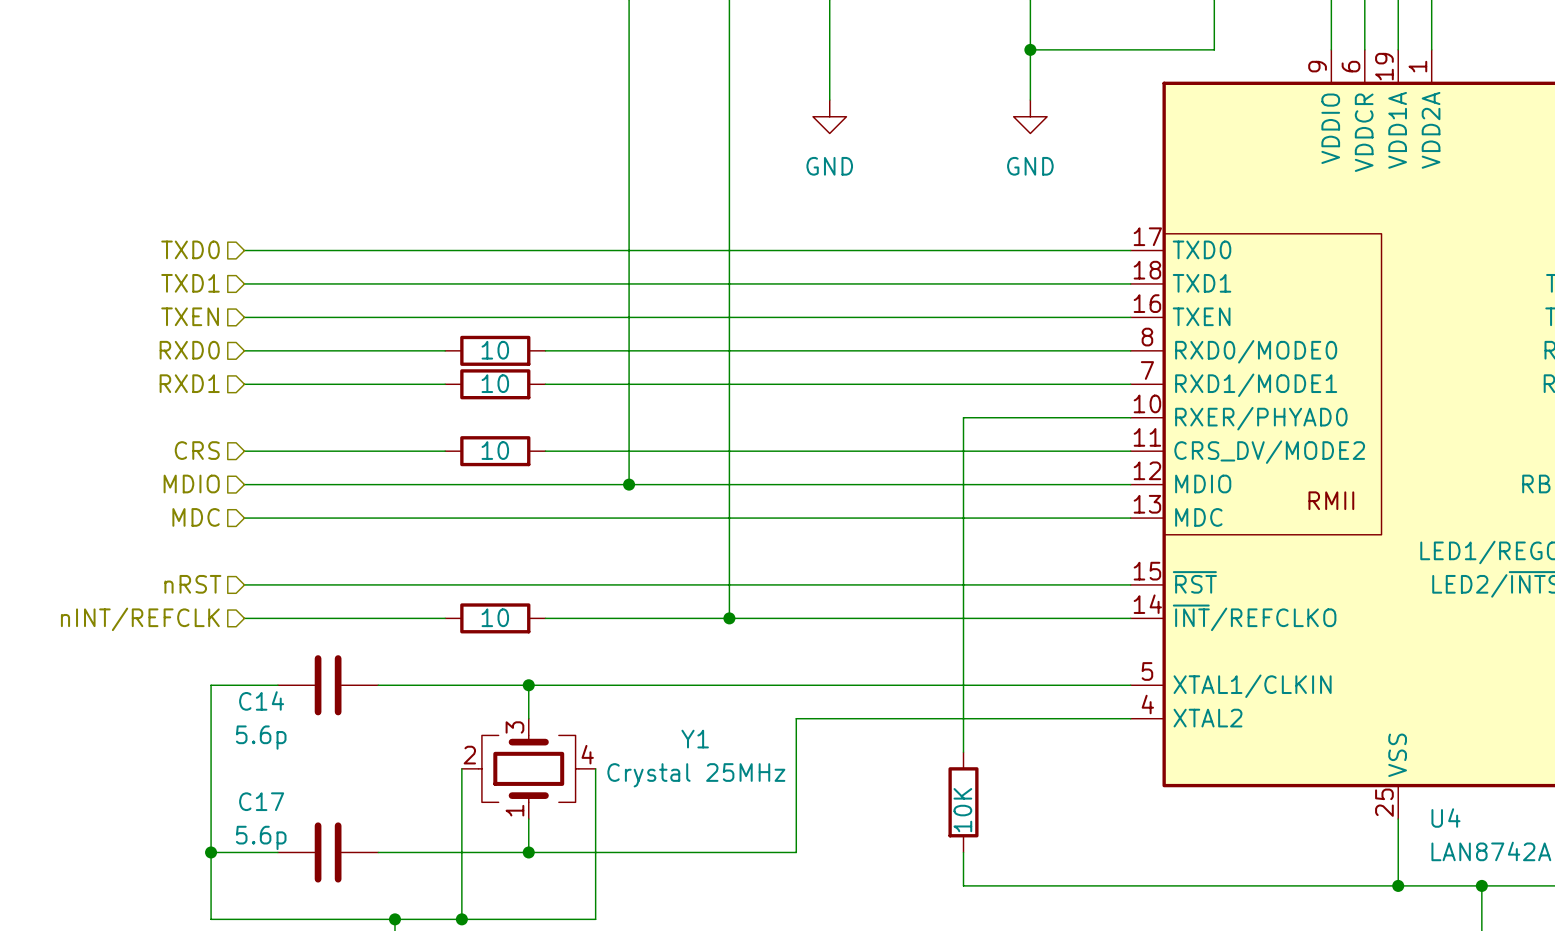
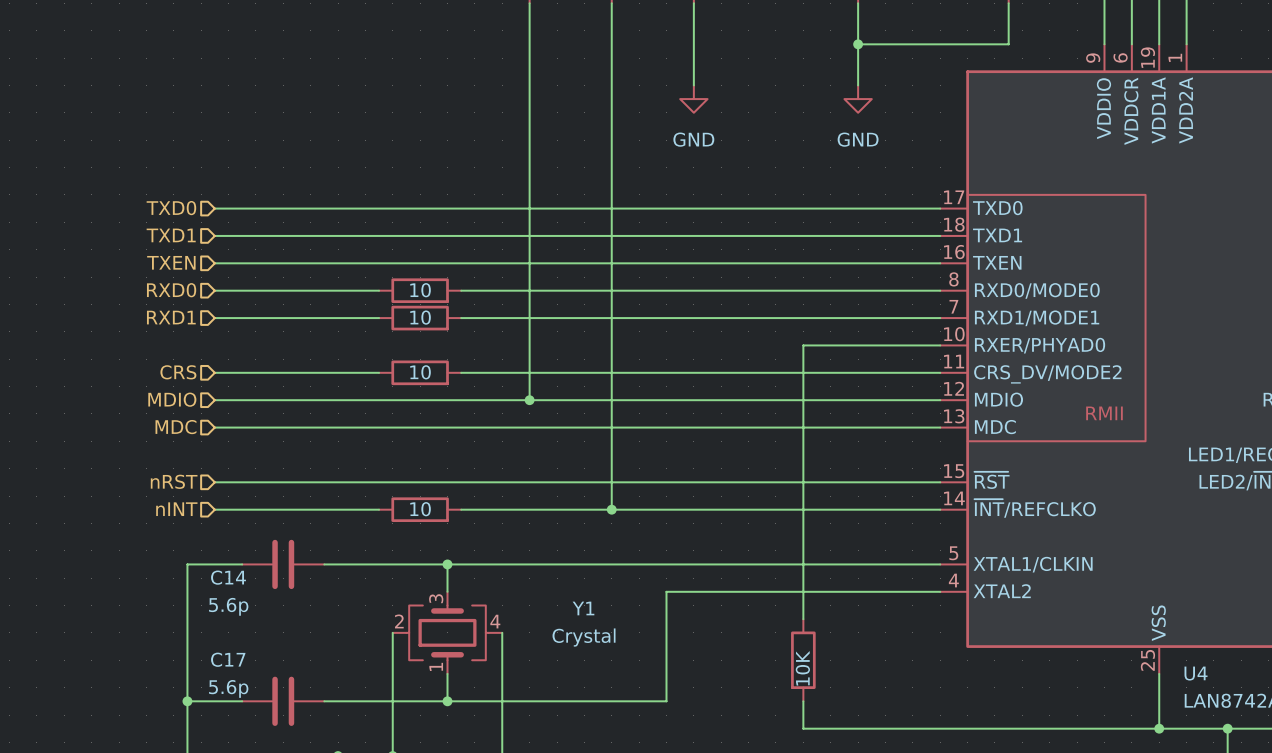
hierarchical label: nINT/REFCLK (140, 619) -> nINT (176, 509)
Y1 value: Crystal 25MHz (696, 775) -> Crystal (584, 637)

